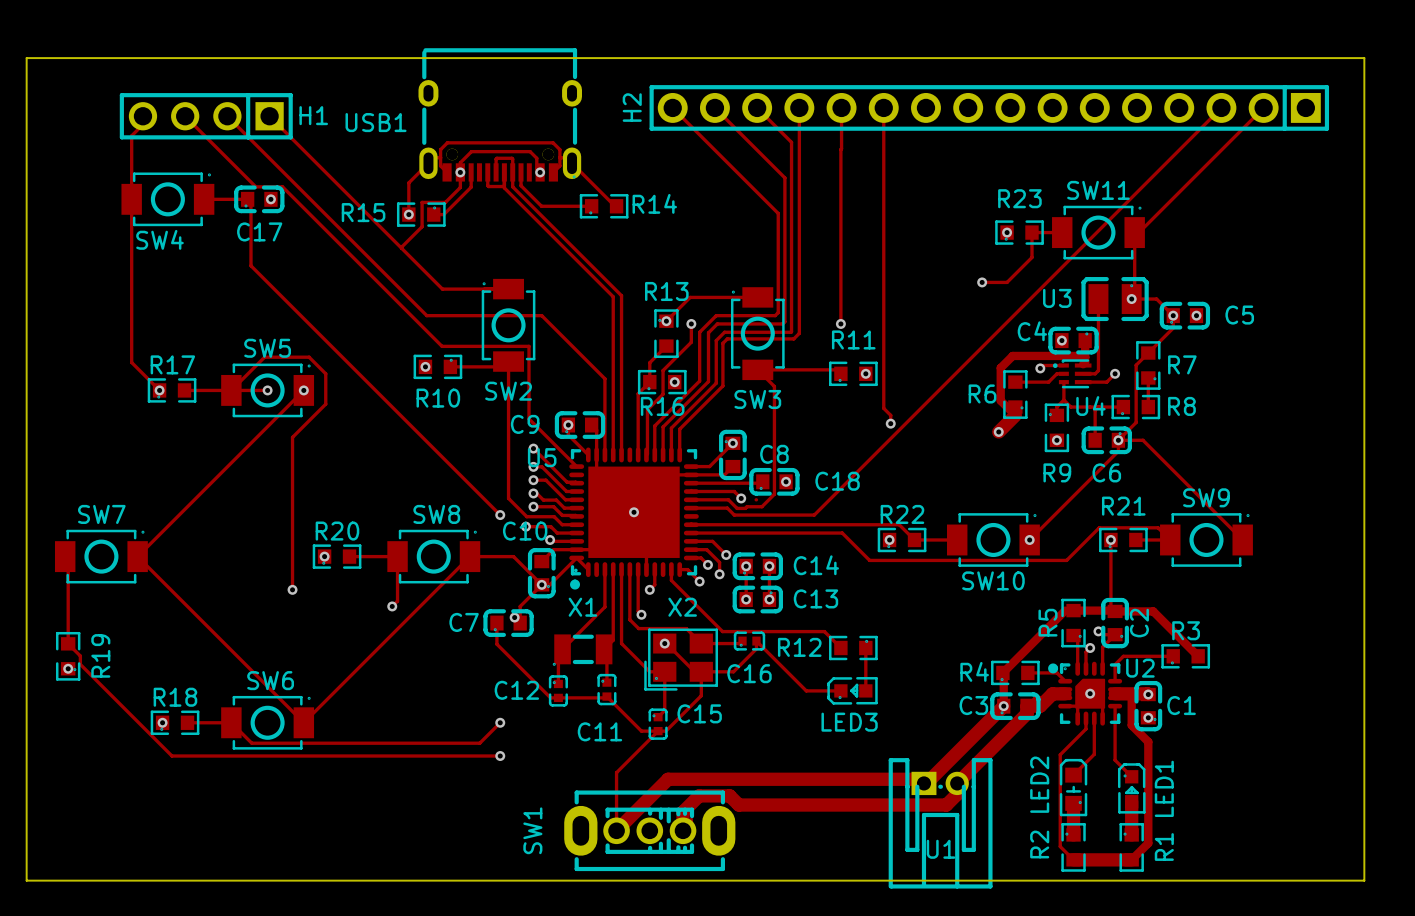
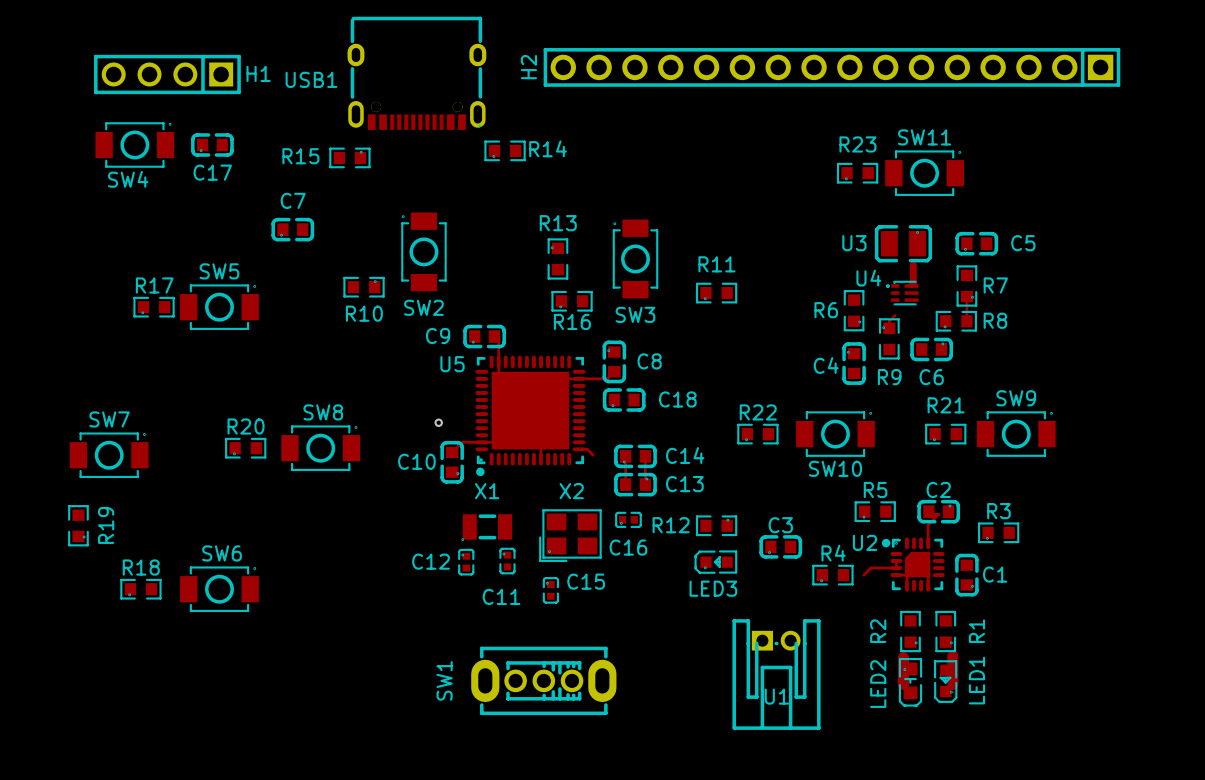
board edge: (26, 58) (1364, 58) (1364, 880) (26, 880) (26, 58) -> none
track: (672, 107) (778, 213) (778, 312) (775, 315) (716, 315) (699, 332) (699, 381) (654, 425) (654, 454) -> none
track: (714, 107) (784, 177) (784, 321) (782, 323) (717, 323) (708, 332) (708, 381) (663, 427) (663, 454) -> none
track: (757, 107) (791, 142) (791, 331) (724, 332) (716, 340) (716, 383) (671, 428) (671, 454) -> none
track: (799, 107) (799, 333) (793, 338) (727, 338) (722, 343) (722, 385) (679, 429) (679, 454) -> none
track: (841, 107) (840, 323) -> none
track: (883, 107) (883, 408) (890, 415) (890, 423) -> none
track: (1221, 107) (814, 515) (734, 515) (727, 508) (691, 508) -> none
track: (1263, 107) (1139, 232) (1134, 232) (1134, 296) (1131, 299) (1156, 299) (1173, 315) (1173, 328) (1136, 365) (1136, 422) (1118, 440) -> none
track: (142, 116) (142, 124) (131, 135) (131, 362) (159, 390) -> none
track: (185, 116) (255, 186) (282, 186) (442, 346) (528, 346) (528, 418) (576, 466) -> none
track: (227, 116) (426, 315) (541, 315) (604, 378) (604, 454) -> none
track: (269, 116) (442, 289) (508, 289) -> none
track: (440, 157) (433, 157) (408, 182) (408, 214) -> none
track: (559, 157) (566, 157) (616, 206) -> none
track: (447, 172) (440, 165) (440, 149) (447, 142) (553, 142) (559, 149) (559, 165) (553, 172) -> none
via: (460, 172) -> none
track: (471, 172) (471, 187) (443, 214) (433, 214) -> none
track: (487, 172) (488, 186) (504, 185) -> none
track: (496, 172) (496, 158) (511, 158) (512, 186) (621, 295) (621, 454) -> none
track: (504, 172) (504, 187) (613, 296) (613, 454) -> none
track: (521, 172) (521, 185) (541, 206) (591, 206) -> none
track: (540, 172) (536, 169) (536, 158) (530, 151) (471, 151) (460, 162) (460, 187) (445, 202) (422, 202) (422, 226) (401, 248) -> none
via: (540, 172) -> none
track: (204, 199) (247, 199) (250, 202) (250, 265) (500, 515) -> none
via: (270, 199) -> none
via: (408, 214) -> none
via: (1007, 232) -> none
track: (1062, 232) (1031, 232) (1031, 257) (1007, 282) (982, 282) -> none
via: (982, 282) -> none
track: (757, 297) (690, 297) (666, 321) -> none
track: (1098, 299) (1098, 370) (1095, 373) (1083, 373) -> none
U3 position: (1115, 299) -> (903, 243)
via: (1131, 299) -> none
via: (1173, 315) -> none
C5 position: (1184, 315) -> (976, 243)
via: (1196, 315) -> none
via: (666, 321) -> none
track: (691, 323) (691, 342) (663, 370) (663, 394) (647, 409) (646, 454) -> none
via: (691, 323) -> none
via: (840, 323) -> none
via: (1061, 340) -> none
C4 rotation: 0° (1073, 340) -> 90° counterclockwise (854, 363)
C4 position: (1073, 340) -> (854, 363)
track: (670, 350) (666, 346) (649, 362) (649, 382) (638, 393) (638, 454) -> none
track: (1085, 357) (1012, 355) (1000, 367) (1000, 400) (1015, 415) -> none
track: (1063, 365) (1043, 365) (1040, 368) -> none
via: (425, 366) -> none
track: (450, 366) (503, 366) (508, 361) (508, 498) (526, 516) (554, 516) (562, 524) (576, 524) -> none
via: (1040, 368) -> none
track: (840, 373) (836, 369) (757, 369) (774, 386) (774, 494) (761, 506) (745, 508) (737, 508) (728, 499) (691, 499) -> none
via: (865, 373) -> none
track: (1063, 373) (1056, 373) (1048, 382) (1015, 382) -> none
track: (1115, 373) (1106, 382) (1083, 382) -> none
via: (1115, 373) -> none
R16 position: (662, 382) -> (572, 301)
via: (674, 382) -> none
track: (1063, 382) (1063, 400) (1070, 407) (1123, 407) -> none
via: (159, 390) -> none
R17 position: (172, 390) -> (154, 307)
track: (184, 390) (267, 390) -> none
track: (231, 390) (264, 357) (309, 357) (325, 373) (325, 404) (292, 437) (292, 589) -> none
via: (267, 390) -> none
track: (303, 390) (137, 556) -> none
via: (303, 390) -> none
U4 name position: U4 (1090, 406) -> U4 (868, 278)
track: (1098, 407) (1095, 410) (1095, 440) -> none
track: (1015, 415) (998, 431) -> none
via: (890, 423) -> none
track: (568, 425) (568, 435) (588, 454) -> none
via: (568, 425) -> none
via: (998, 431) -> none
via: (1056, 440) -> none
track: (1118, 440) (1143, 440) (1242, 539) -> none
track: (1118, 440) (1118, 451) (1029, 539) -> none
via: (1118, 440) -> none
track: (732, 443) (709, 466) (691, 466) -> none
via: (732, 443) -> none
track: (533, 448) (567, 482) (576, 483) -> none
via: (533, 448) -> none
track: (533, 466) (541, 466) (566, 491) (576, 491) -> none
via: (533, 466) -> none
track: (533, 480) (545, 480) (565, 499) (576, 499) -> none
via: (533, 480) -> none
track: (762, 481) (691, 483) -> none
C18 position: (774, 481) -> (624, 399)
via: (786, 481) -> none
track: (691, 490) (734, 491) (741, 498) -> none
track: (533, 493) (536, 493) (543, 500) (556, 500) (564, 508) (576, 508) -> none
via: (533, 493) -> none
via: (741, 498) -> none
track: (533, 506) (553, 506) (562, 515) (576, 516) -> none
via: (533, 506) -> none
via: (634, 512) -> none
via: (500, 515) -> none
track: (691, 523) (899, 524) (914, 539) (957, 539) -> none
track: (525, 526) (550, 526) (557, 533) (576, 533) -> none
C10 name position: C10 (525, 531) -> C10 (416, 461)
track: (691, 533) (842, 533) (869, 560) (1066, 560) (1099, 527) (1158, 527) (1170, 539) (1135, 539) -> none
track: (550, 539) (576, 541) -> none
via: (550, 539) -> none
via: (889, 539) -> none
via: (1029, 539) -> none
track: (1110, 539) (1110, 607) (1115, 611) (1153, 611) (1198, 656) -> none
via: (1110, 539) -> none
track: (691, 541) (712, 541) (726, 554) -> none
track: (691, 549) (706, 549) (719, 562) (719, 574) -> none
via: (726, 554) -> none
track: (65, 556) (68, 559) (68, 643) (80, 656) (80, 664) (171, 756) (500, 756) -> none
SW7 position: (101, 556) -> (109, 455)
track: (137, 556) (303, 722) (470, 556) (513, 556) (541, 584) -> none
via: (324, 556) -> none
R20 position: (337, 556) -> (245, 448)
track: (349, 556) (397, 556) (397, 601) (392, 606) -> none
SW8 position: (433, 556) -> (320, 448)
via: (707, 564) -> none
via: (746, 566) -> none
via: (769, 566) -> none
track: (588, 569) (576, 557) (549, 584) (541, 584) -> none
track: (604, 569) (604, 606) (558, 653) (558, 683) -> none
track: (613, 569) (613, 640) (604, 649) (606, 652) (606, 682) -> none
track: (621, 569) (621, 643) (649, 671) (664, 671) (664, 710) (658, 717) -> none
track: (629, 569) (629, 619) (638, 628) (686, 628) (701, 643) (740, 643) (742, 641) -> none
track: (638, 569) (638, 611) (641, 614) -> none
track: (654, 569) (654, 584) (649, 589) -> none
track: (671, 569) (671, 580) (722, 631) (824, 631) (840, 648) -> none
track: (679, 569) (687, 569) (699, 581) -> none
via: (719, 574) -> none
via: (699, 581) -> none
track: (541, 584) (520, 606) (520, 623) -> none
via: (541, 584) -> none
via: (292, 589) -> none
via: (649, 589) -> none
via: (746, 599) -> none
via: (769, 599) -> none
via: (392, 606) -> none
track: (1114, 610) (1065, 610) (1002, 672) (1003, 706) (926, 783) (919, 779) (668, 779) (616, 830) (616, 772) (658, 731) -> none
via: (641, 614) -> none
via: (514, 617) -> none
C7 name position: C7 (464, 622) -> C7 (293, 200)
track: (496, 623) (496, 644) (550, 697) (606, 696) (641, 731) (665, 731) (701, 695) (701, 671) -> none
C7 position: (508, 623) -> (292, 229)
R5 rotation: 0° (1073, 623) -> 90° clockwise (875, 511)
R5 position: (1073, 623) -> (875, 511)
C2 rotation: 0° (1115, 623) -> 90° counterclockwise (938, 511)
via: (1098, 631) -> none
track: (1073, 635) (1077, 639) (1077, 668) -> none
track: (664, 643) (694, 671) (733, 671) (756, 648) (756, 641) (806, 690) (840, 690) -> none
via: (664, 643) -> none
track: (1090, 648) (1086, 652) (1086, 668) -> none
via: (1090, 648) -> none
track: (865, 649) (865, 690) -> none
R19 position: (68, 656) -> (78, 525)
track: (1173, 656) (1123, 656) (1115, 664) (1115, 681) -> none
via: (68, 668) -> none
U2 name position: U2 (1140, 668) -> U2 (864, 542)
R4 name position: R4 (974, 671) -> R4 (833, 553)
R4 position: (1015, 672) -> (832, 575)
track: (1027, 672) (1056, 672) (1065, 681) -> none
track: (1115, 689) (1115, 697) (1144, 697) (1148, 694) (1115, 693) -> none
track: (1065, 693) (1052, 693) (1040, 706) (1027, 706) (1027, 713) (957, 783) (957, 794) (946, 805) (738, 805) (729, 795) (699, 795) (683, 811) (683, 830) (691, 822) (691, 819) -> none
via: (1090, 693) -> none
via: (1148, 694) -> none
track: (1131, 697) (1131, 725) (1148, 741) (1148, 843) (1131, 859) (1073, 859) (1060, 846) (1060, 754) (1086, 729) (1086, 718) -> none
C3 name position: C3 (973, 705) -> C3 (780, 525)
via: (1003, 706) -> none
C3 position: (1015, 706) -> (780, 546)
track: (1115, 706) (1115, 760) (1131, 776) -> none
via: (1148, 717) -> none
track: (1094, 718) (1094, 754) (1073, 775) -> none
via: (162, 722) -> none
track: (187, 722) (231, 722) (251, 743) (479, 743) (500, 722) -> none
via: (500, 722) -> none
via: (500, 756) -> none
LED2 rotation: 0° (1073, 787) -> 180° (910, 682)
LED2 position: (1073, 787) -> (910, 682)
LED1 rotation: 0° (1131, 788) -> 180° (945, 681)
LED1 position: (1131, 788) -> (945, 681)
U1 position: (940, 823) -> (776, 674)
R2 rotation: 0° (1073, 847) -> 180° (910, 631)
R2 position: (1073, 847) -> (910, 631)
R1 rotation: 0° (1131, 847) -> 180° (945, 631)
R1 position: (1131, 847) -> (945, 631)

